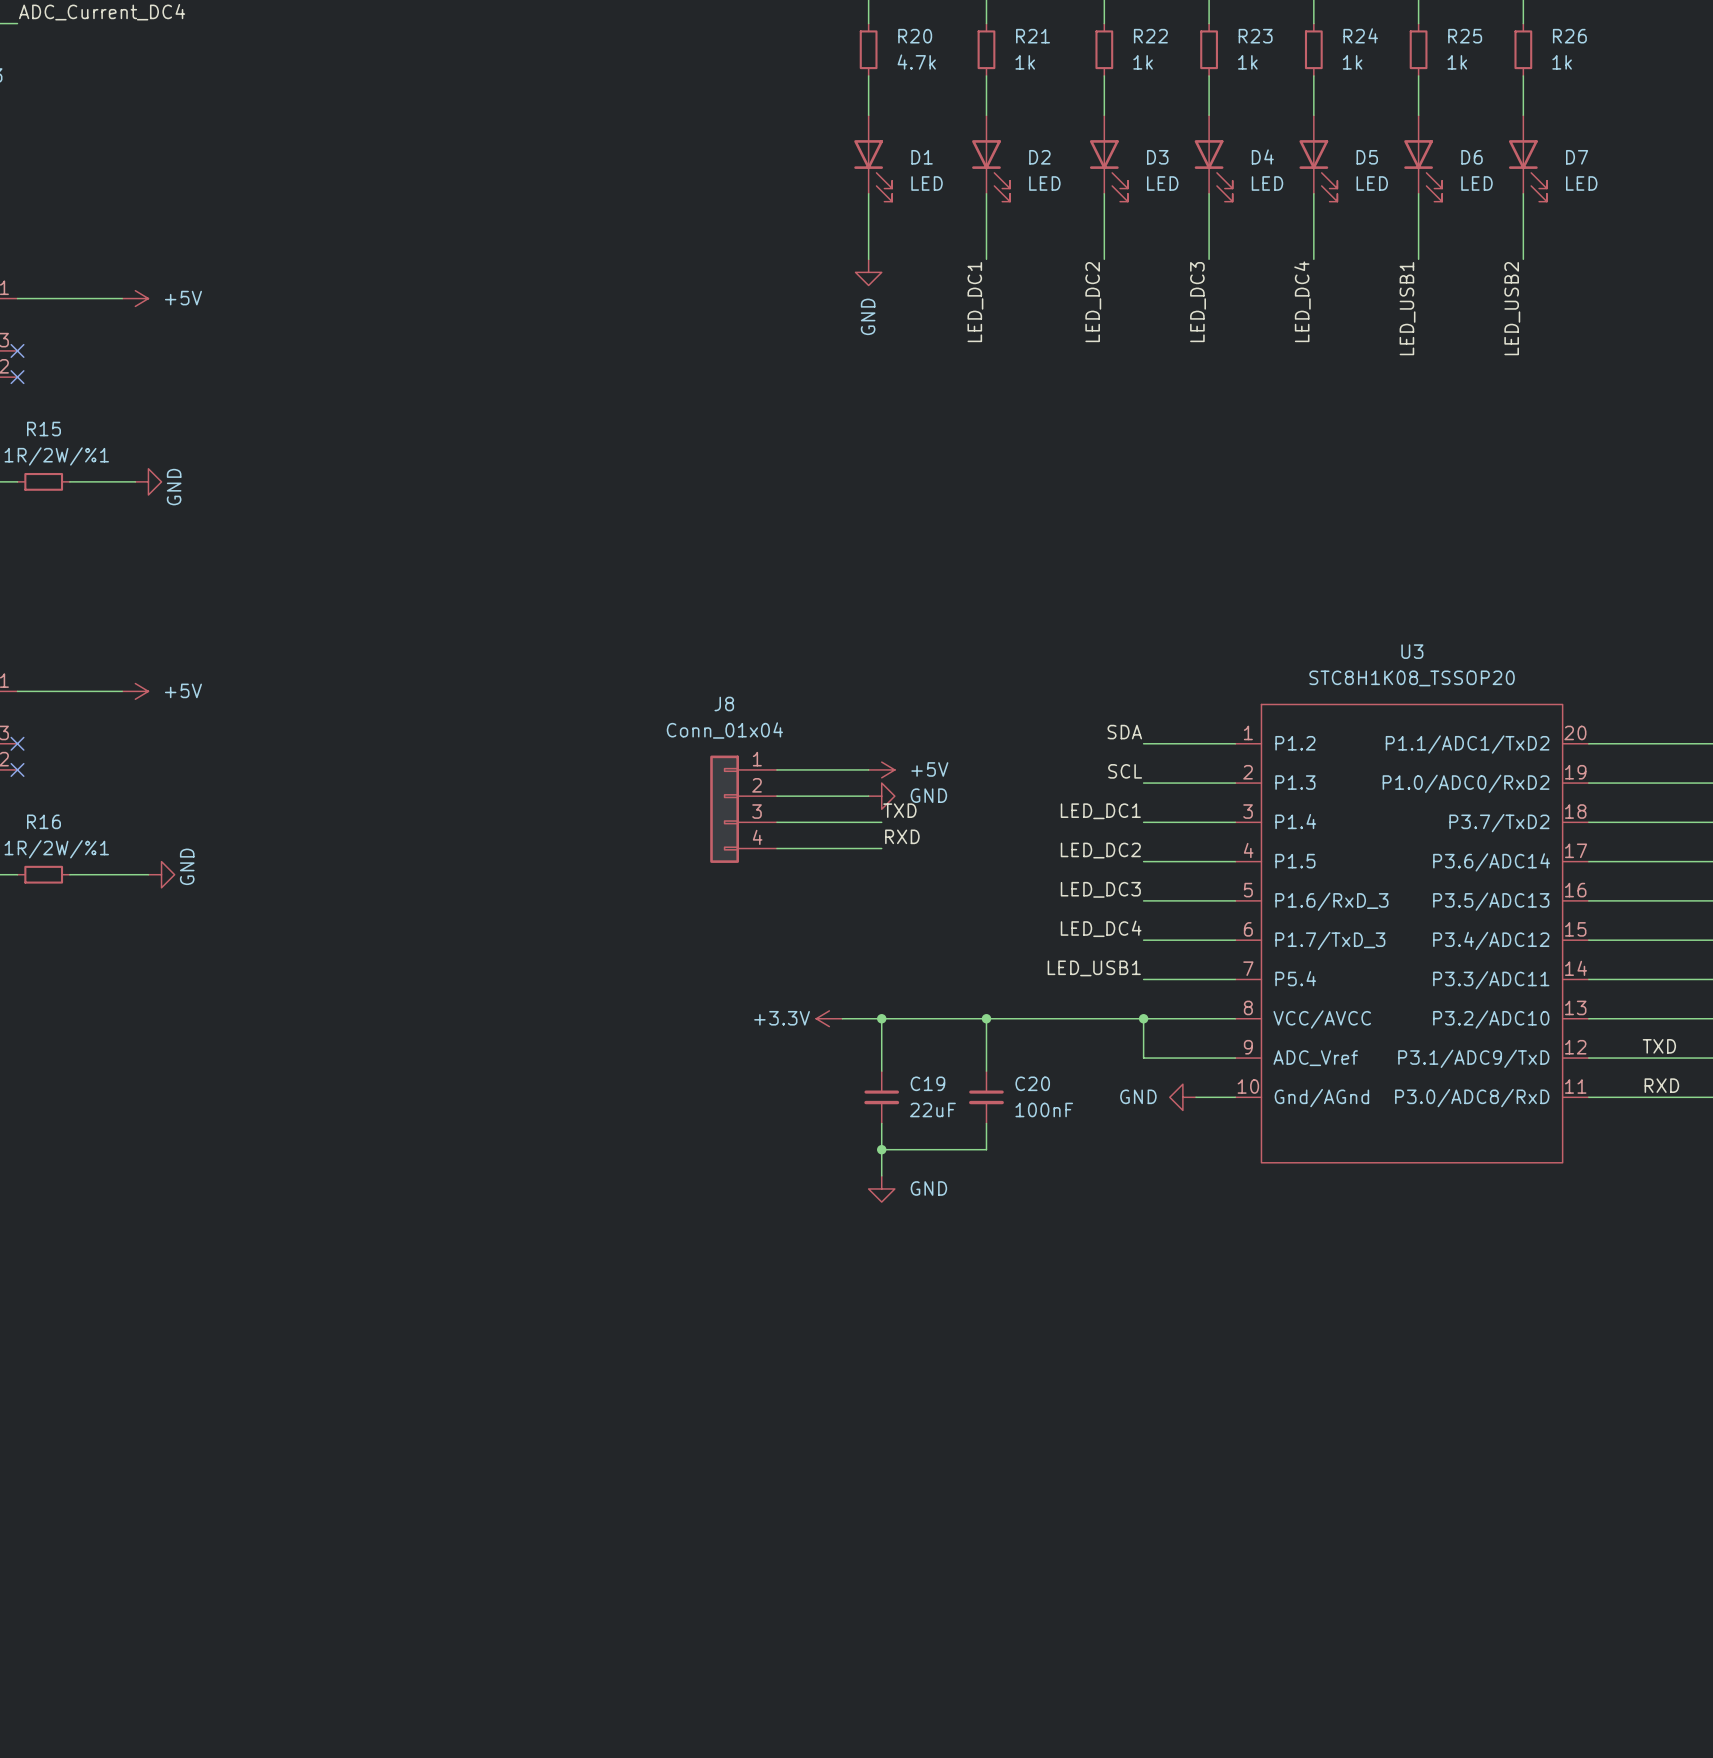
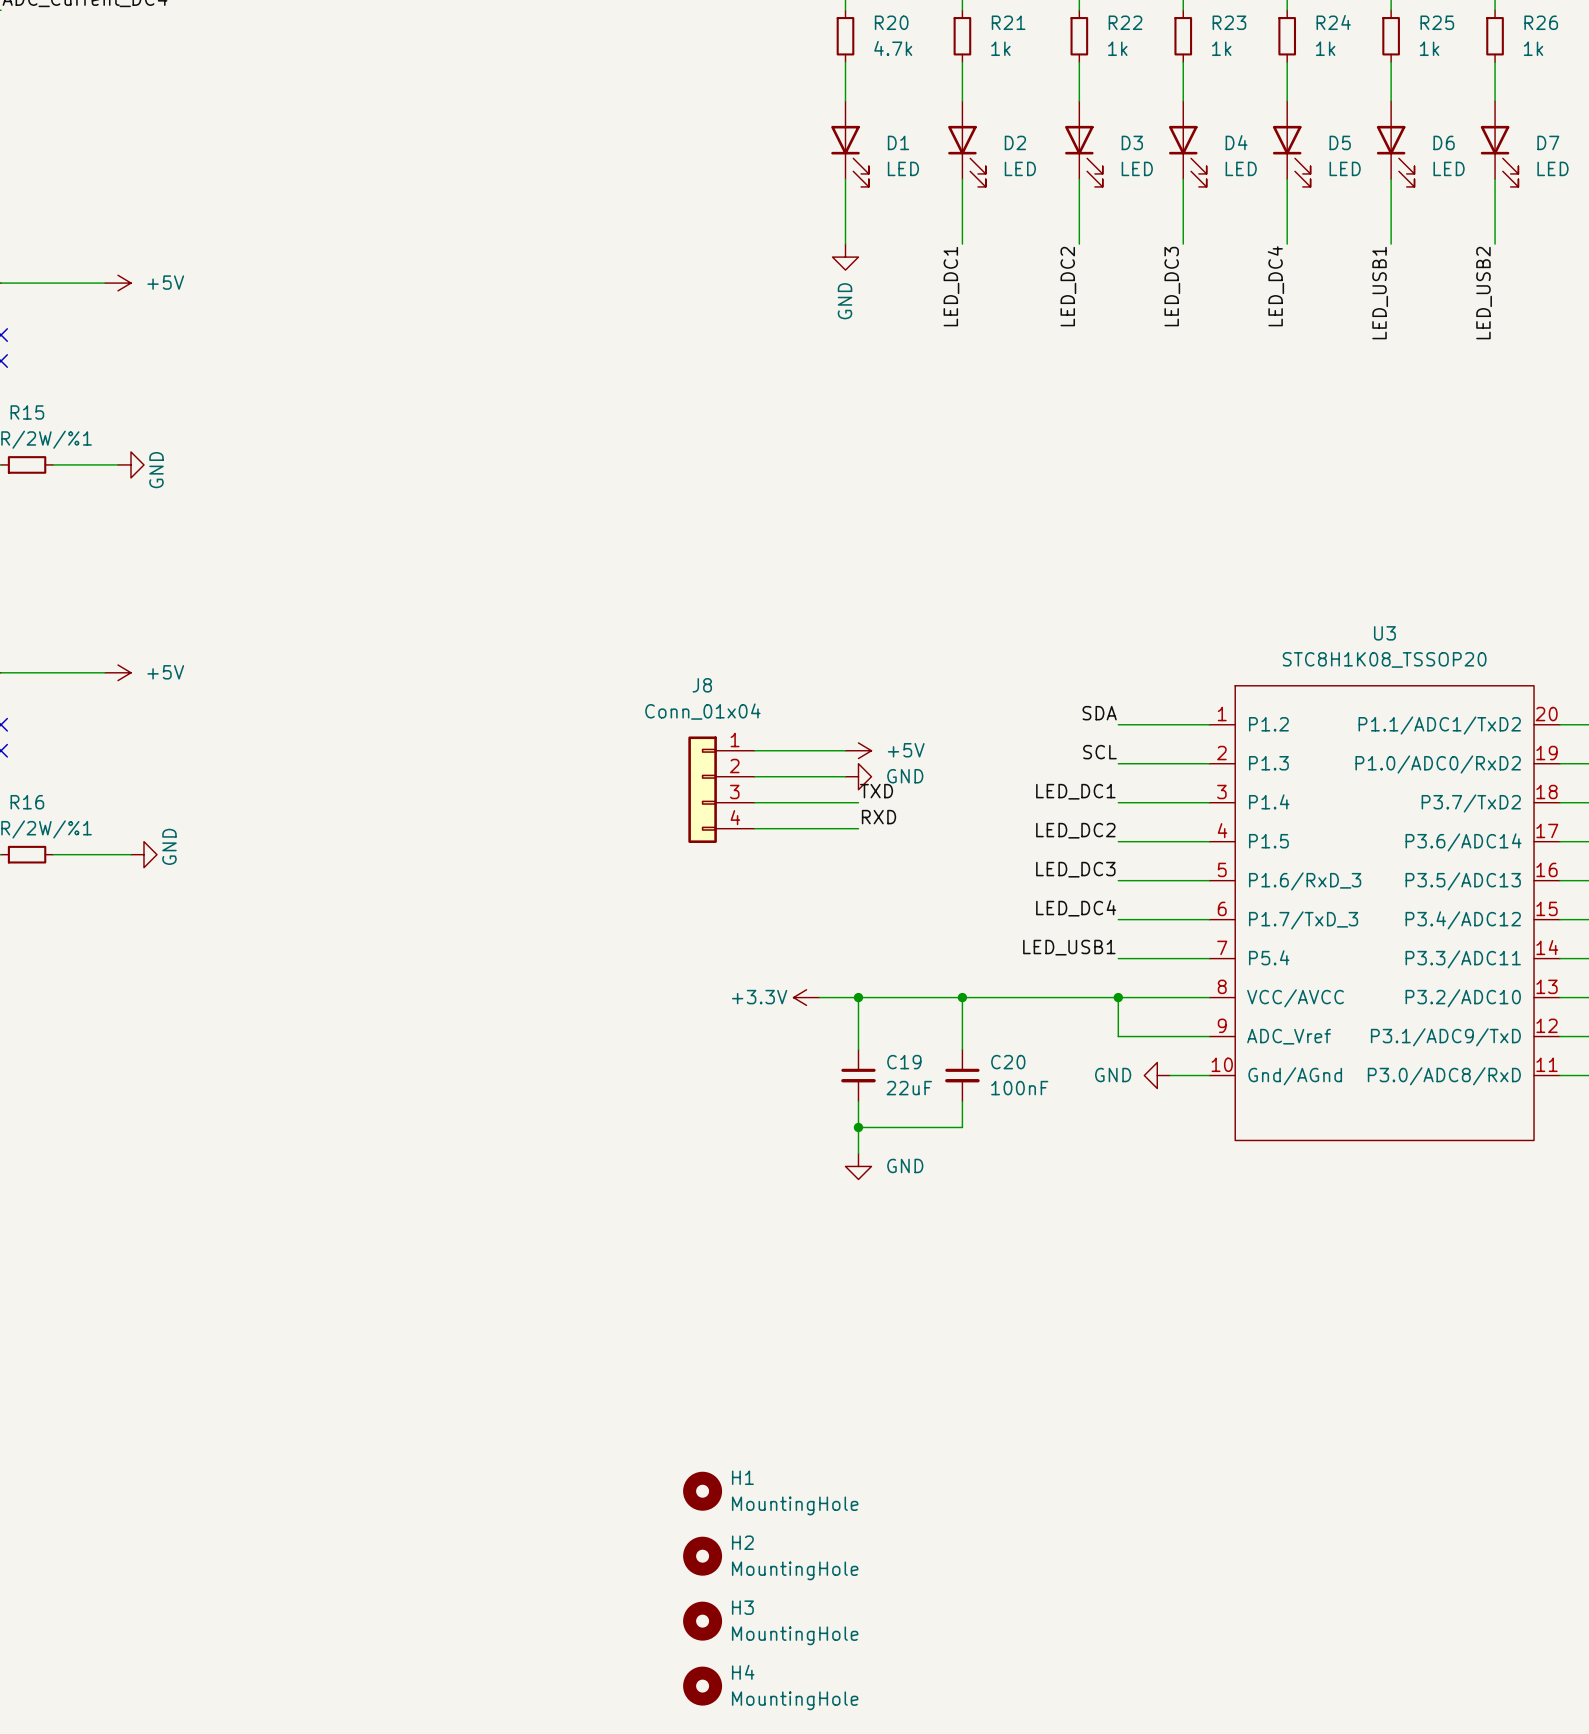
H1: none -> MountingHole (702, 1491)
H2: none -> MountingHole (702, 1556)
H3: none -> MountingHole (702, 1621)
H4: none -> MountingHole (702, 1686)

